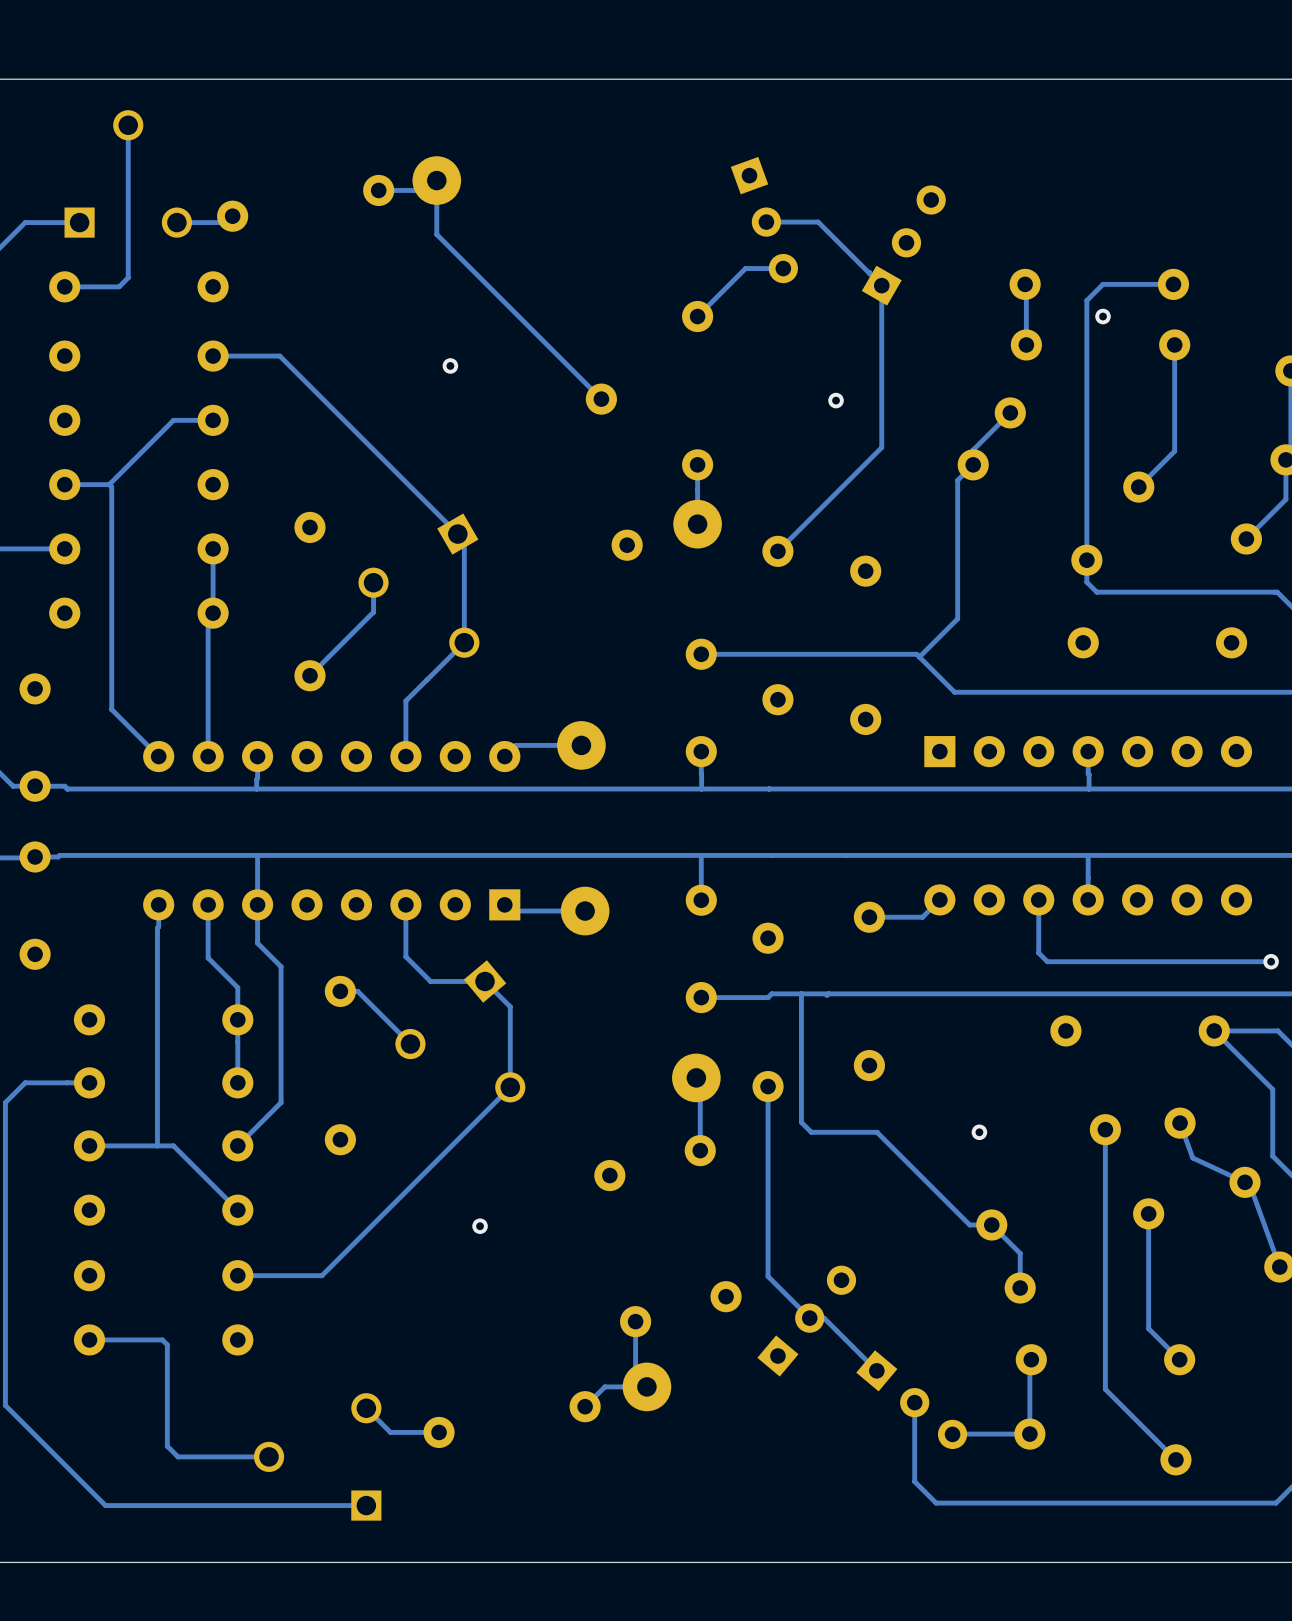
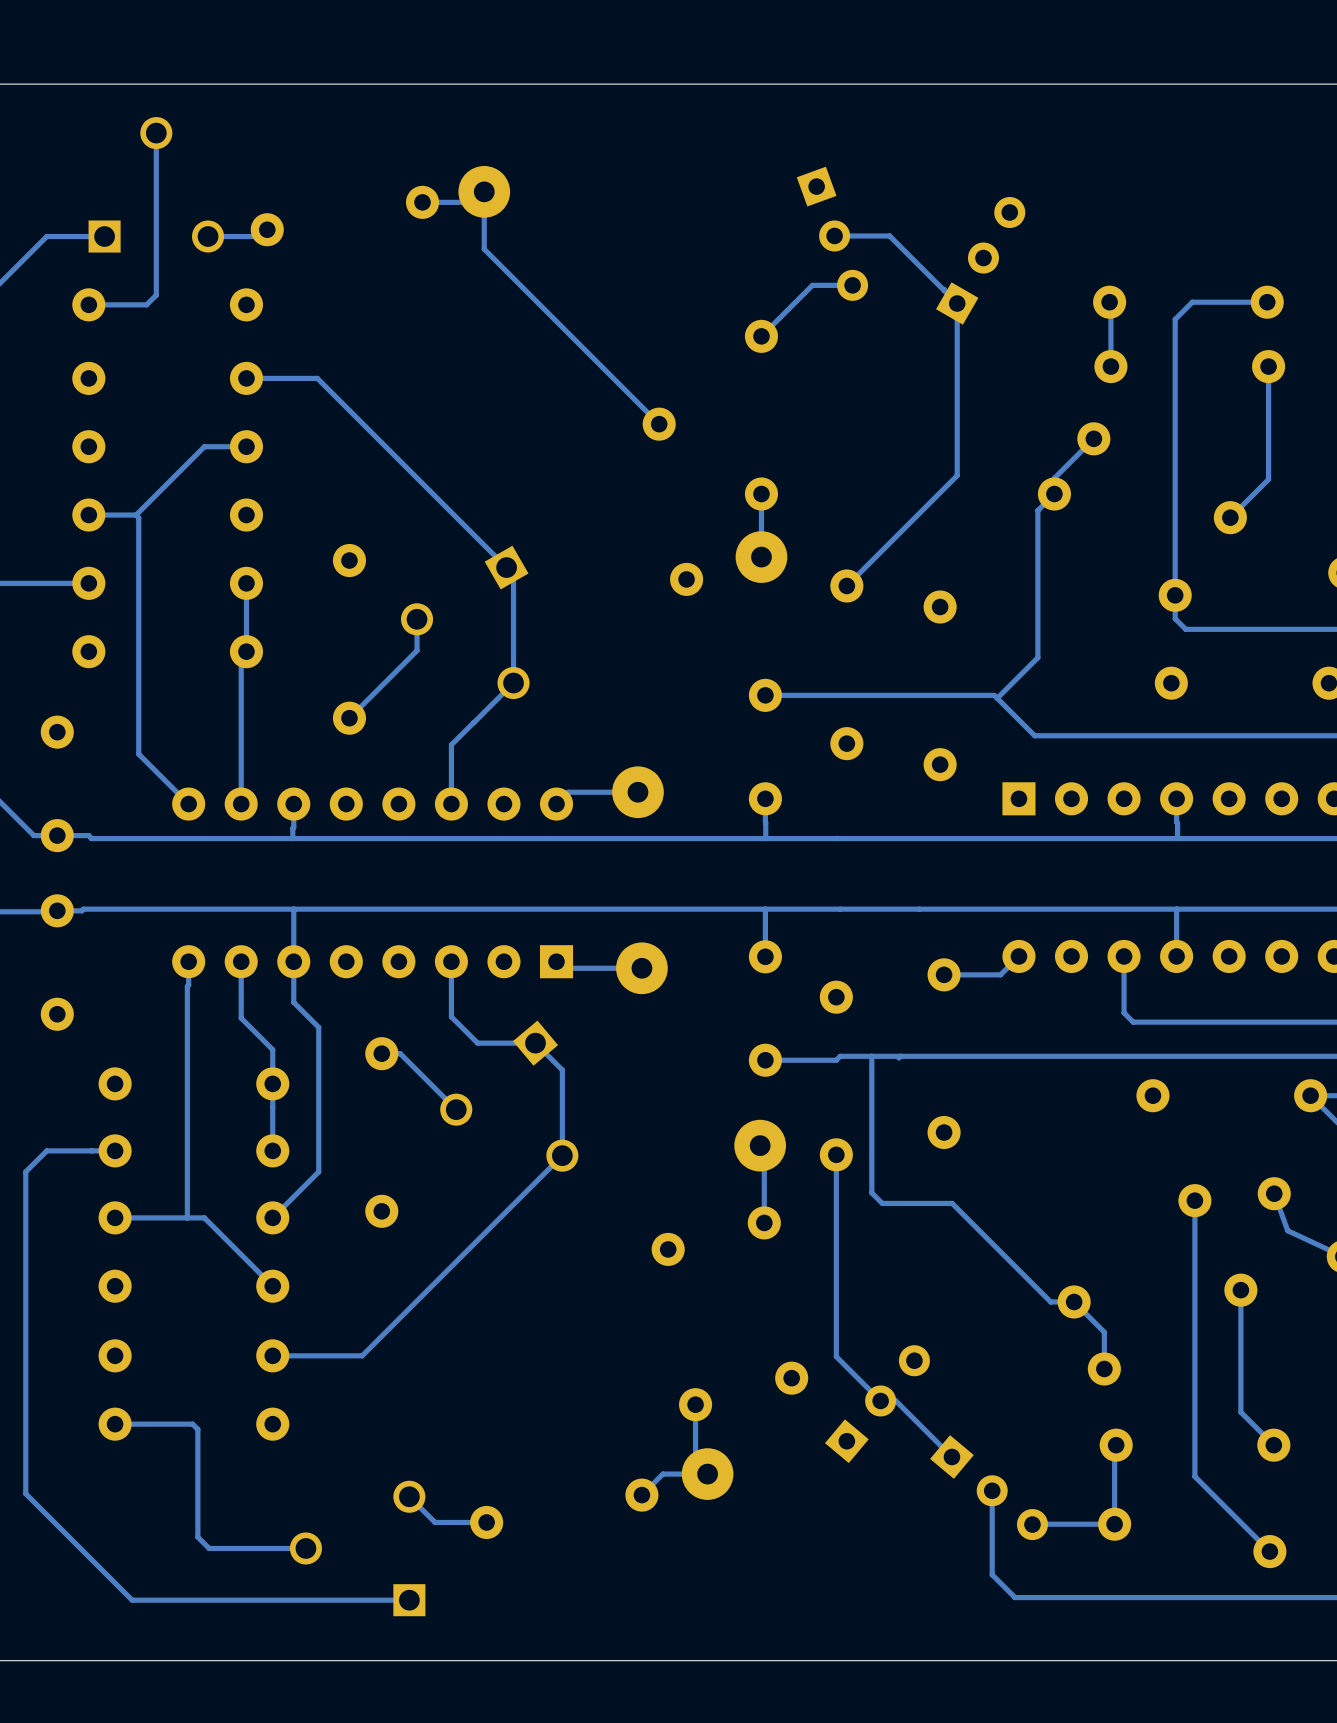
via: (1103, 316) -> none
via: (450, 365) -> none
via: (836, 400) -> none
via: (979, 1132) -> none
via: (480, 1226) -> none

